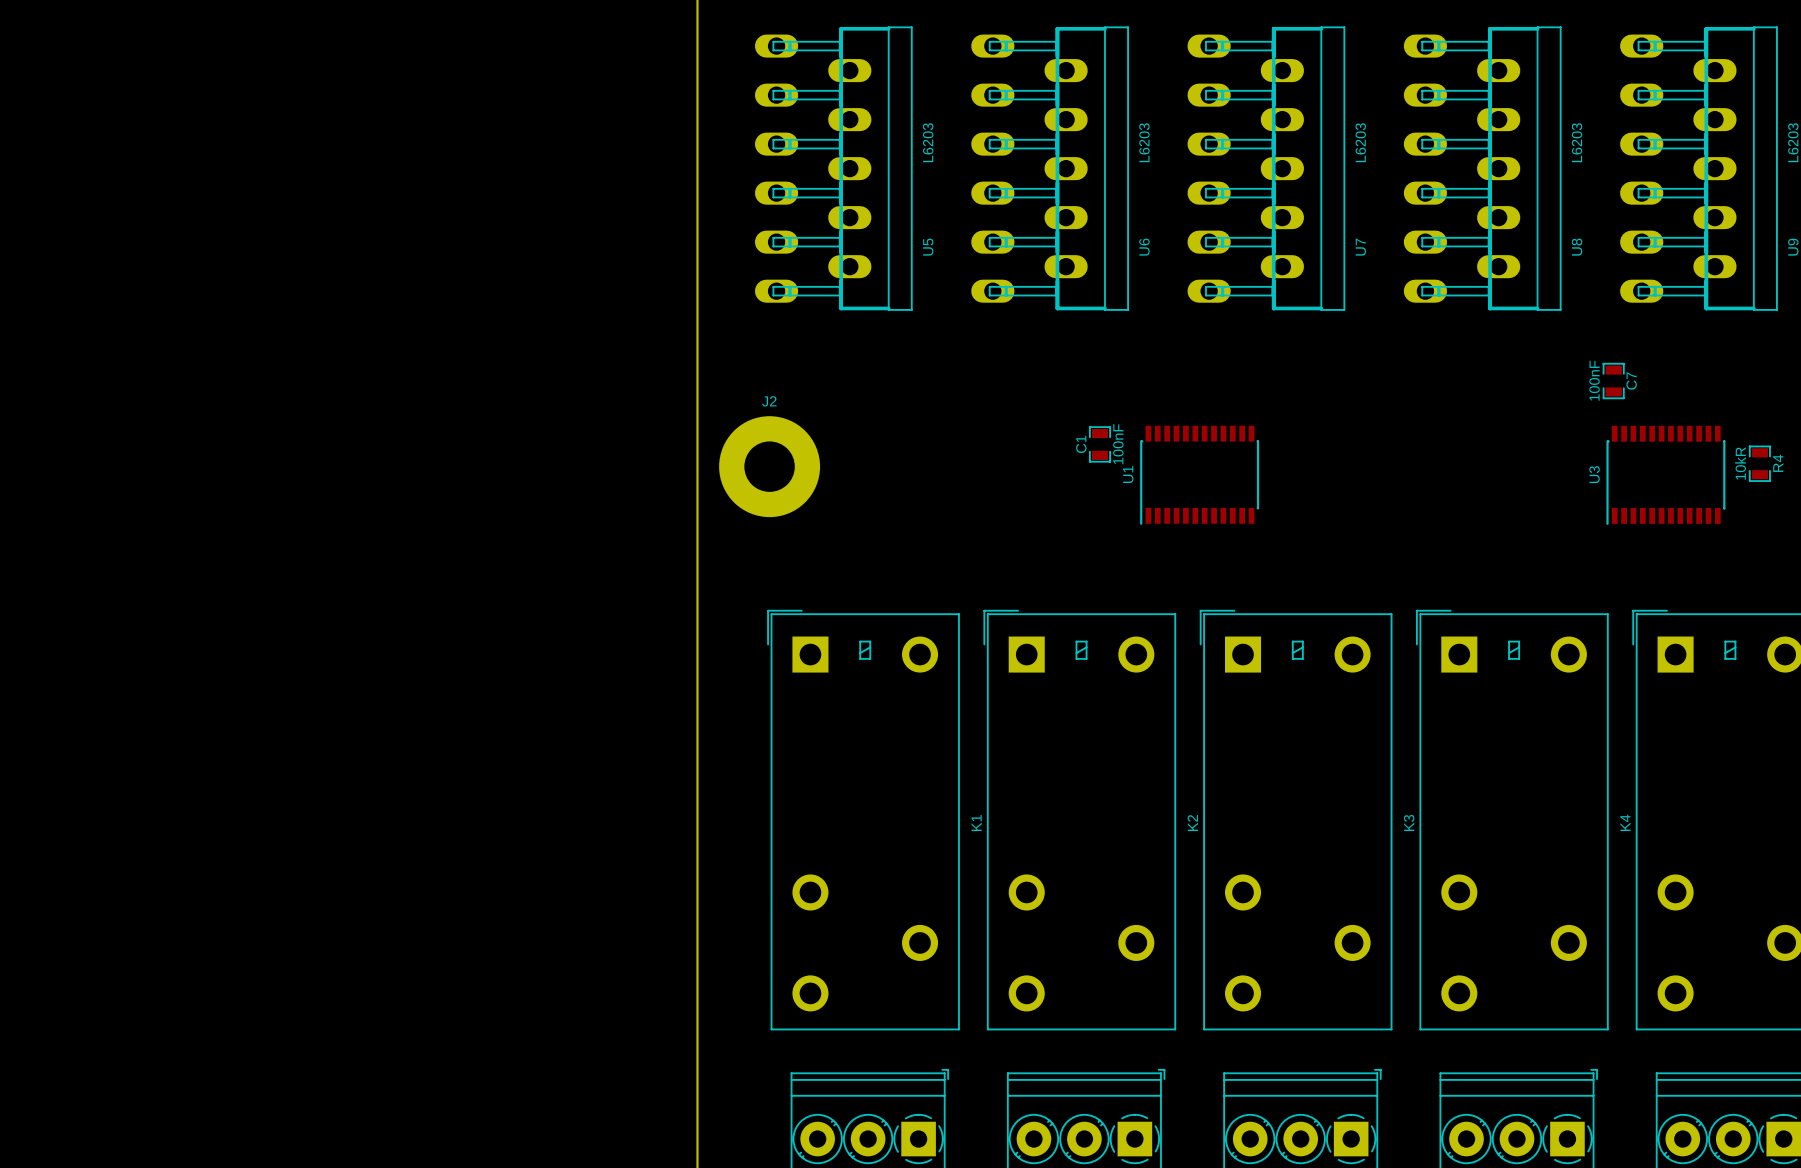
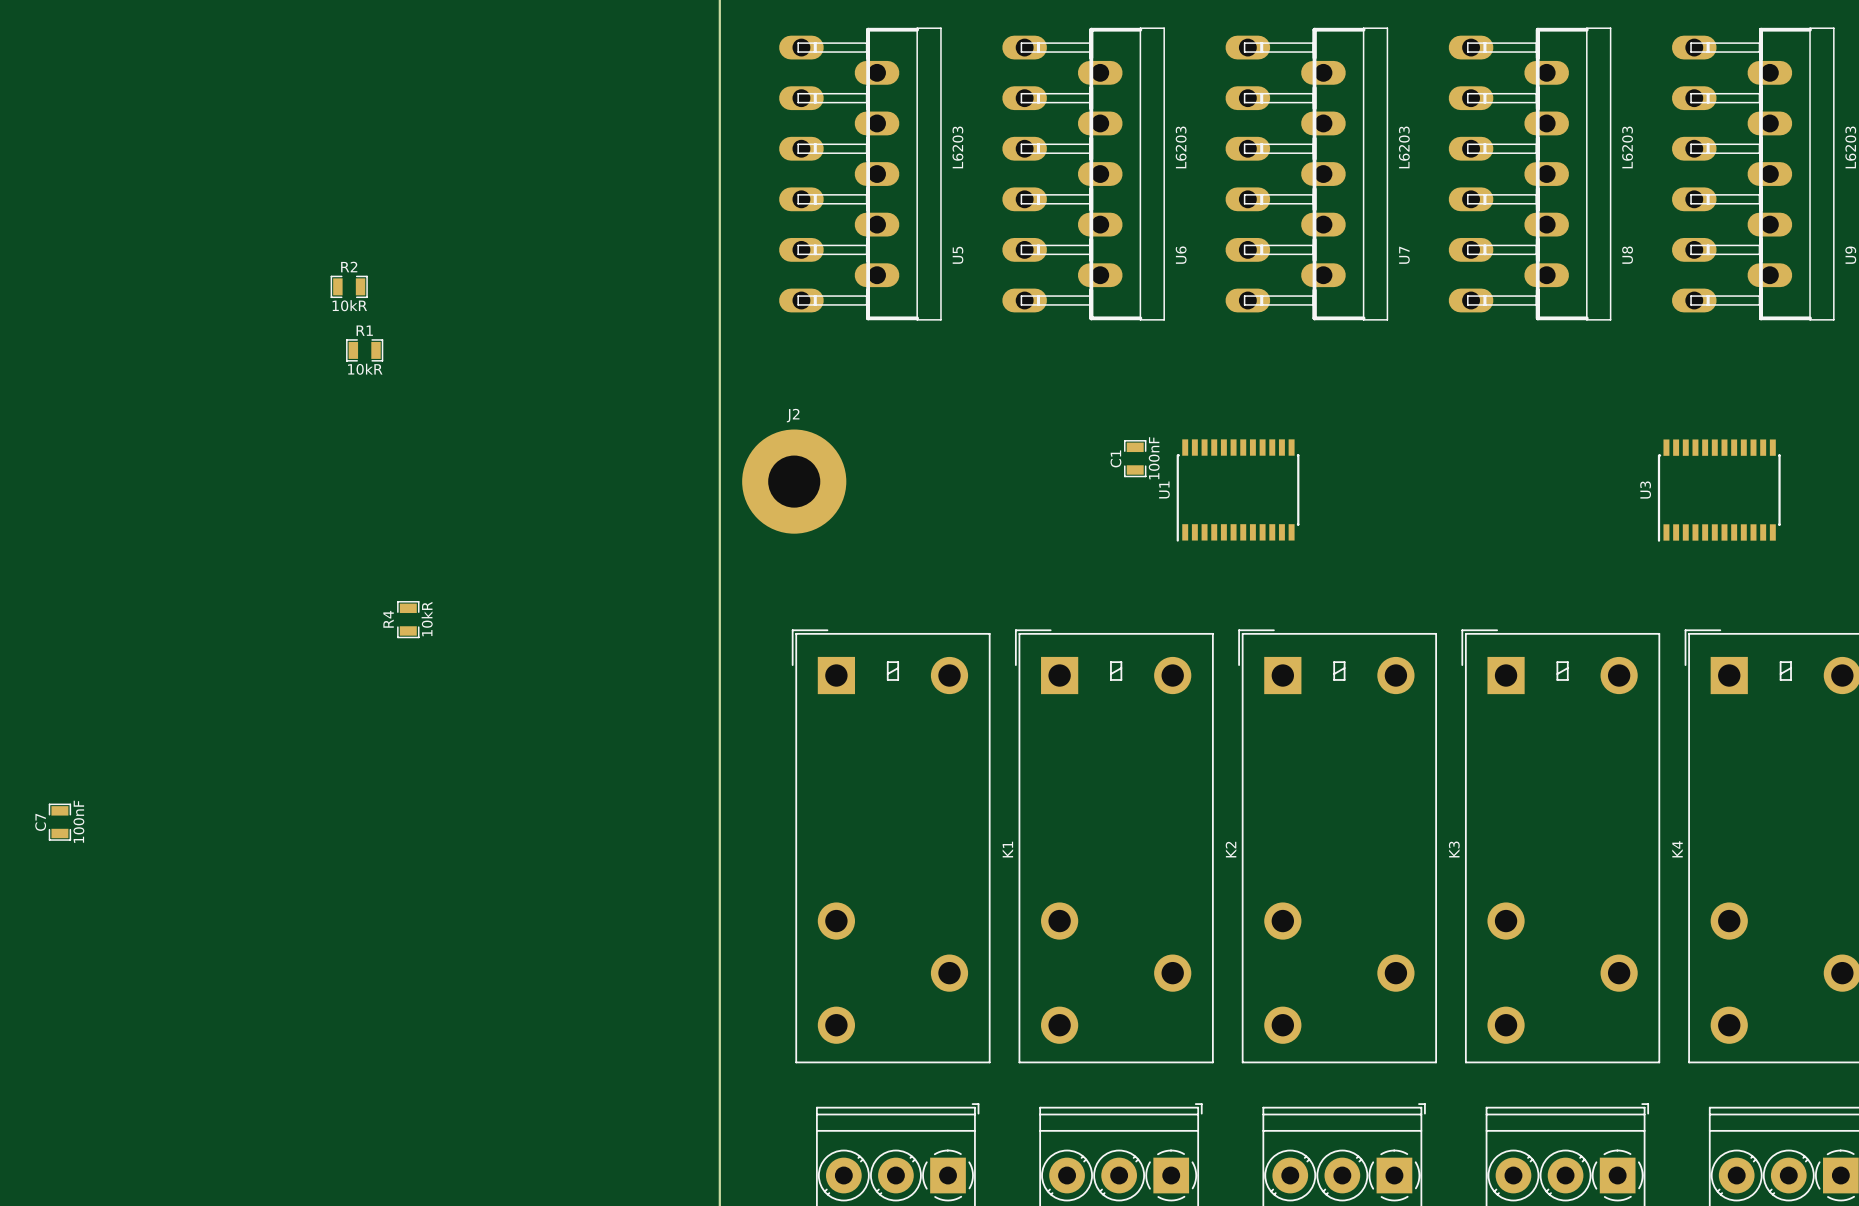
R2: none -> 10kR (349, 286)
R1: none -> 10kR (364, 350)
C7 rotation: 0° (1613, 381) -> 180° (59, 822)
C7 position: (1613, 381) -> (59, 822)
R4 rotation: 0° (1759, 463) -> 180° (408, 619)
R4 position: (1759, 463) -> (408, 619)

